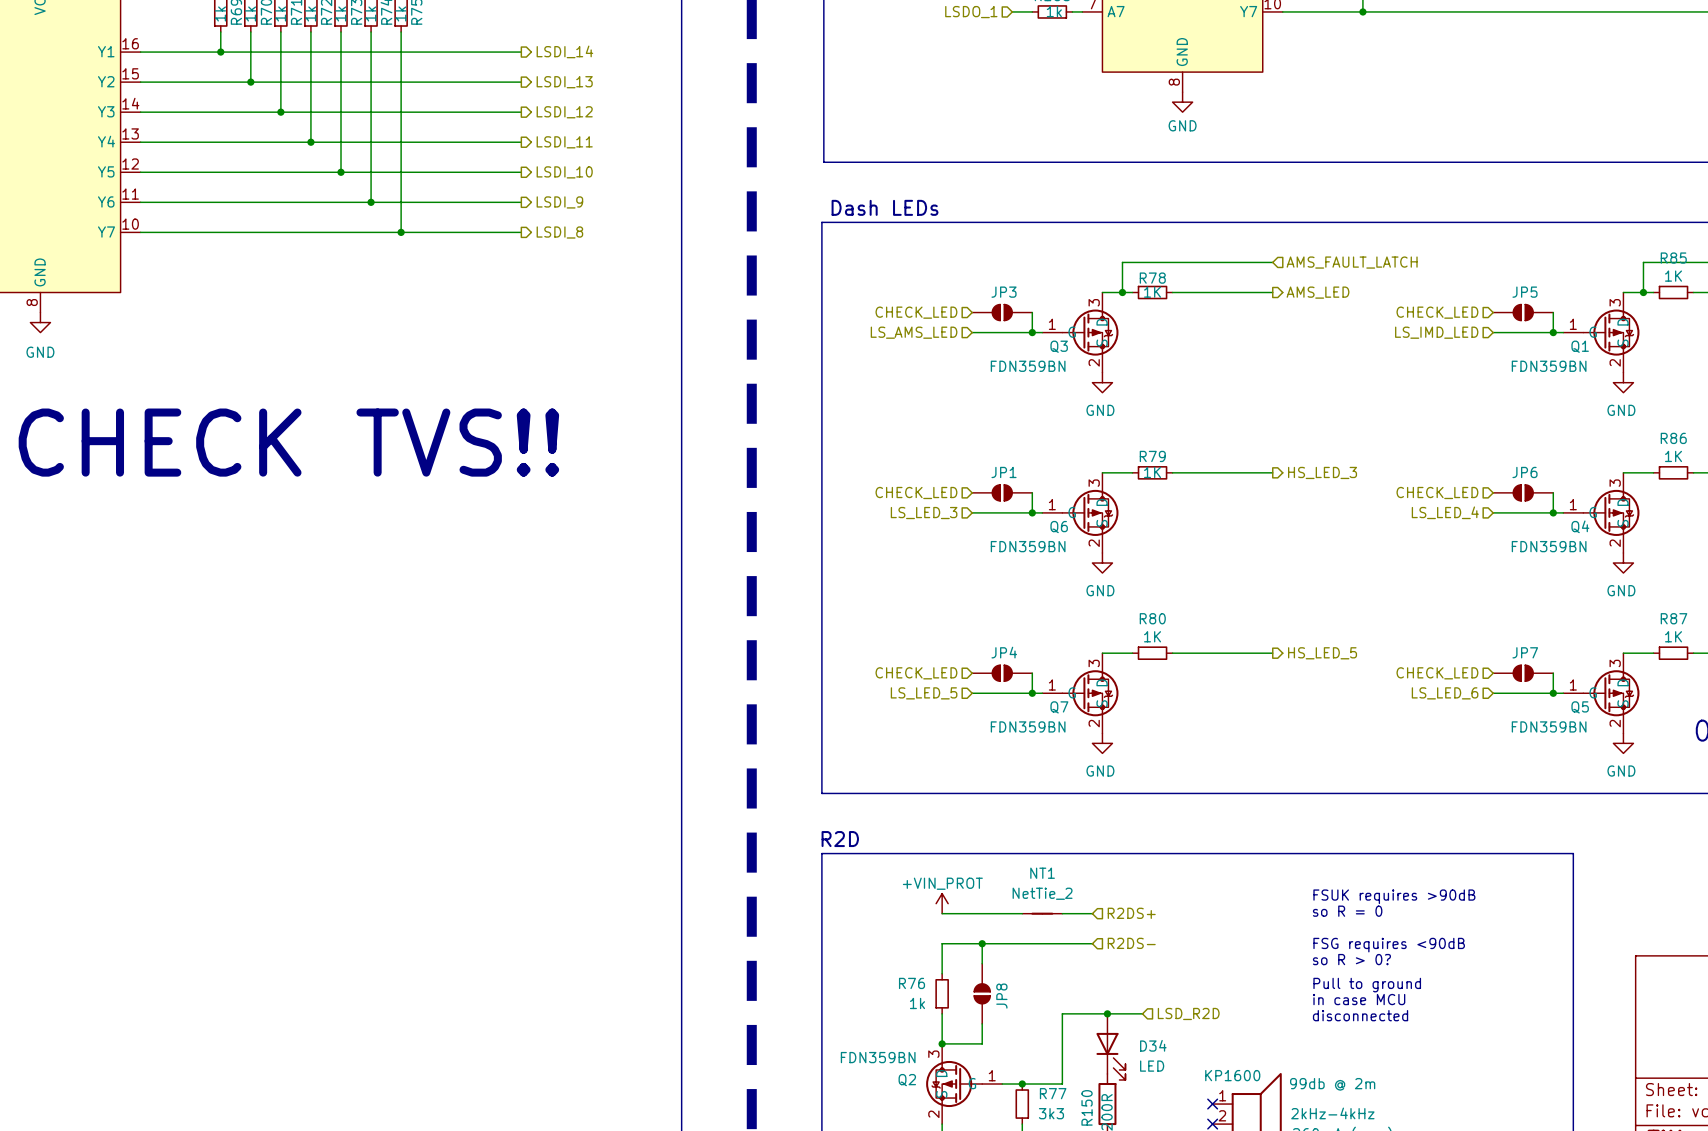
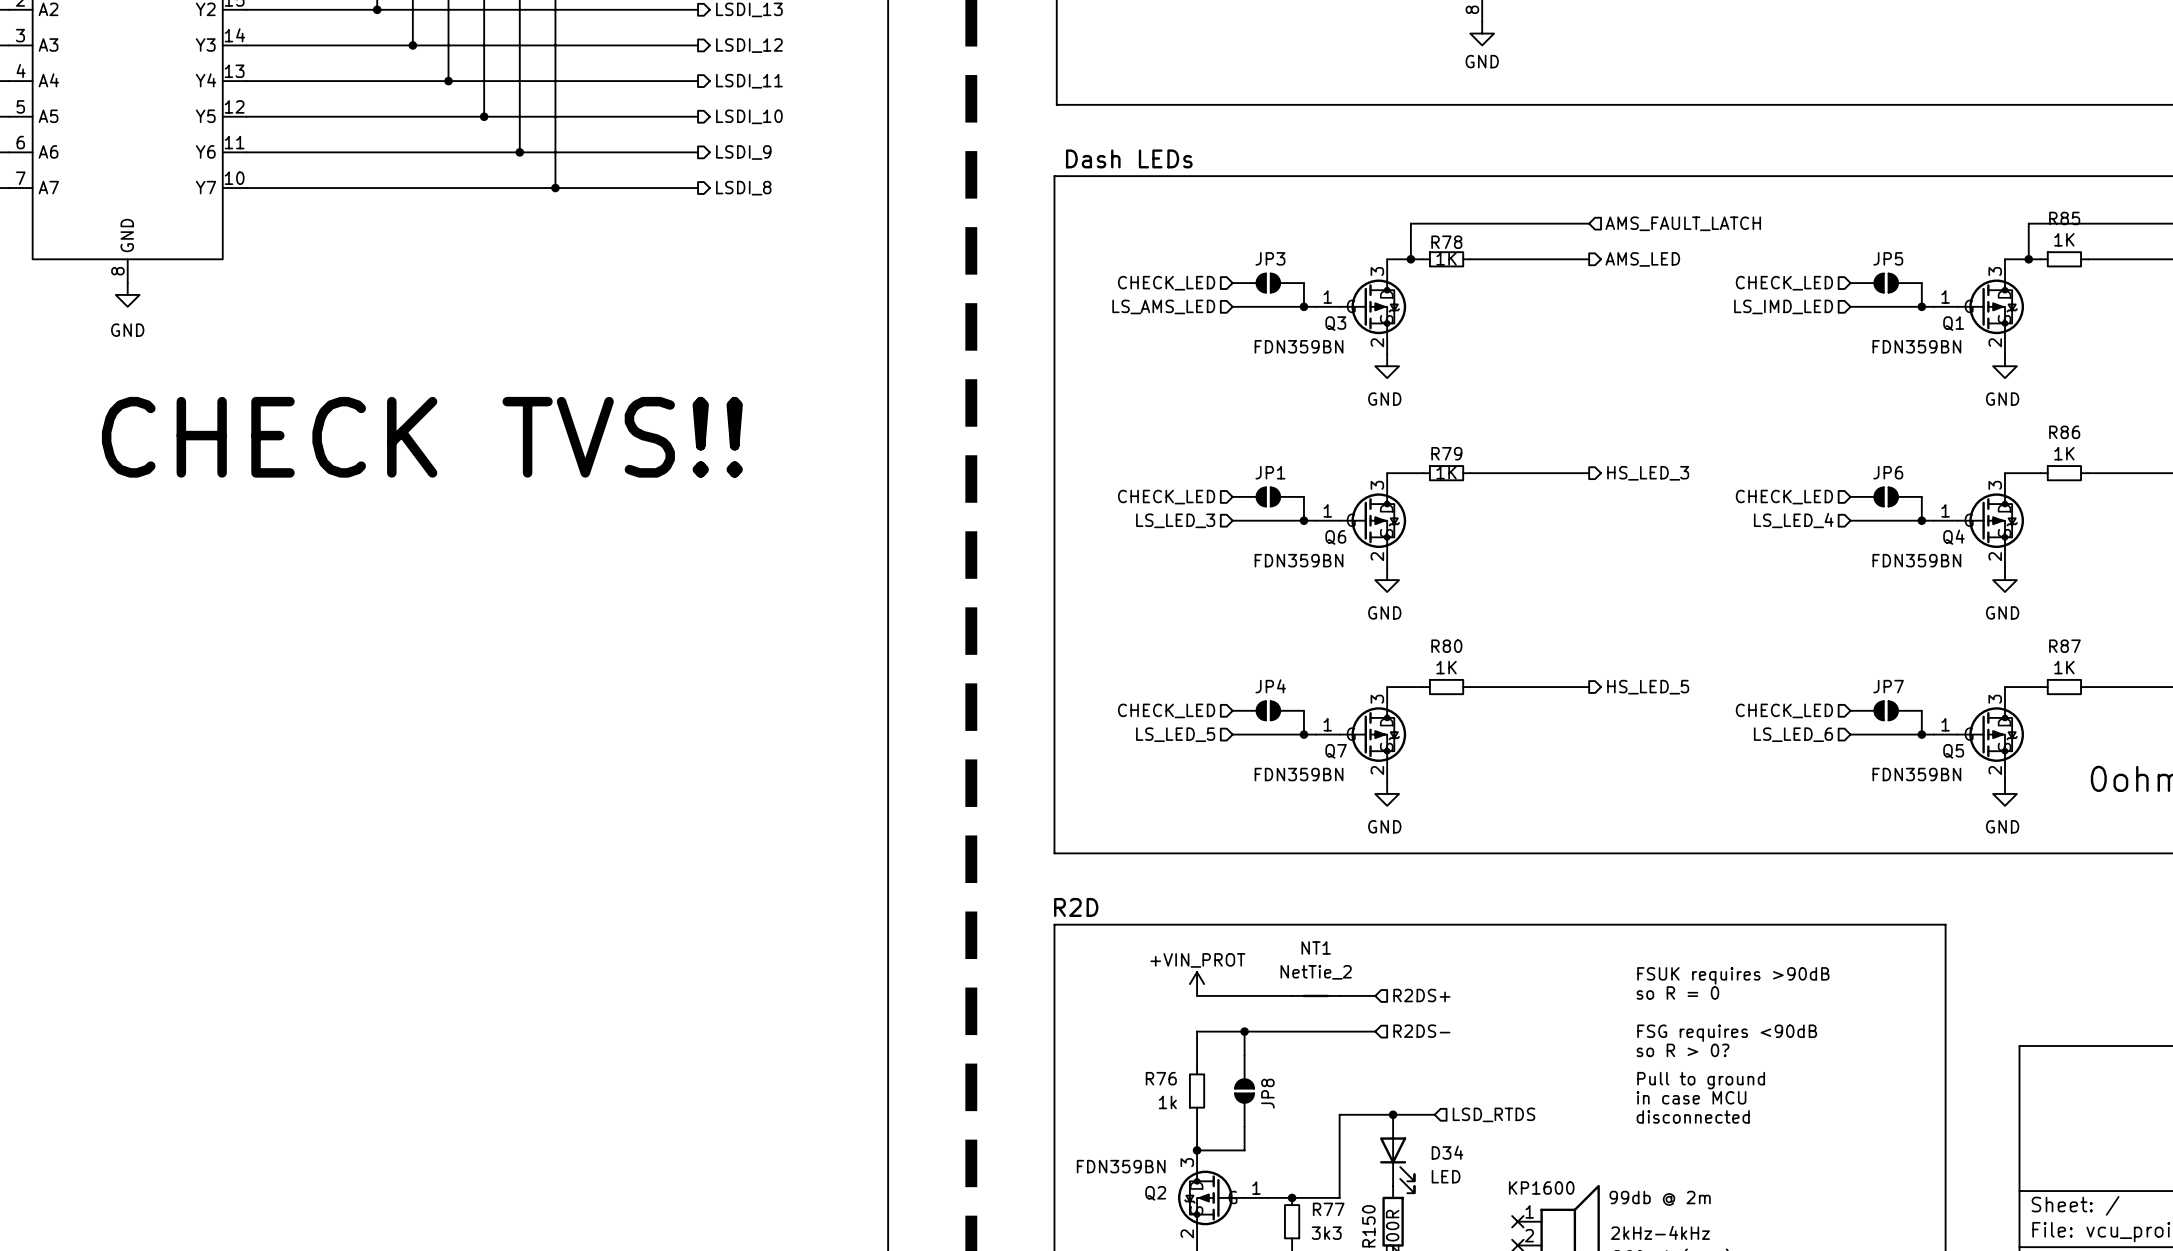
hierarchical label: LSD_R2D (1188, 1013) -> LSD_RTDS (1493, 1114)

